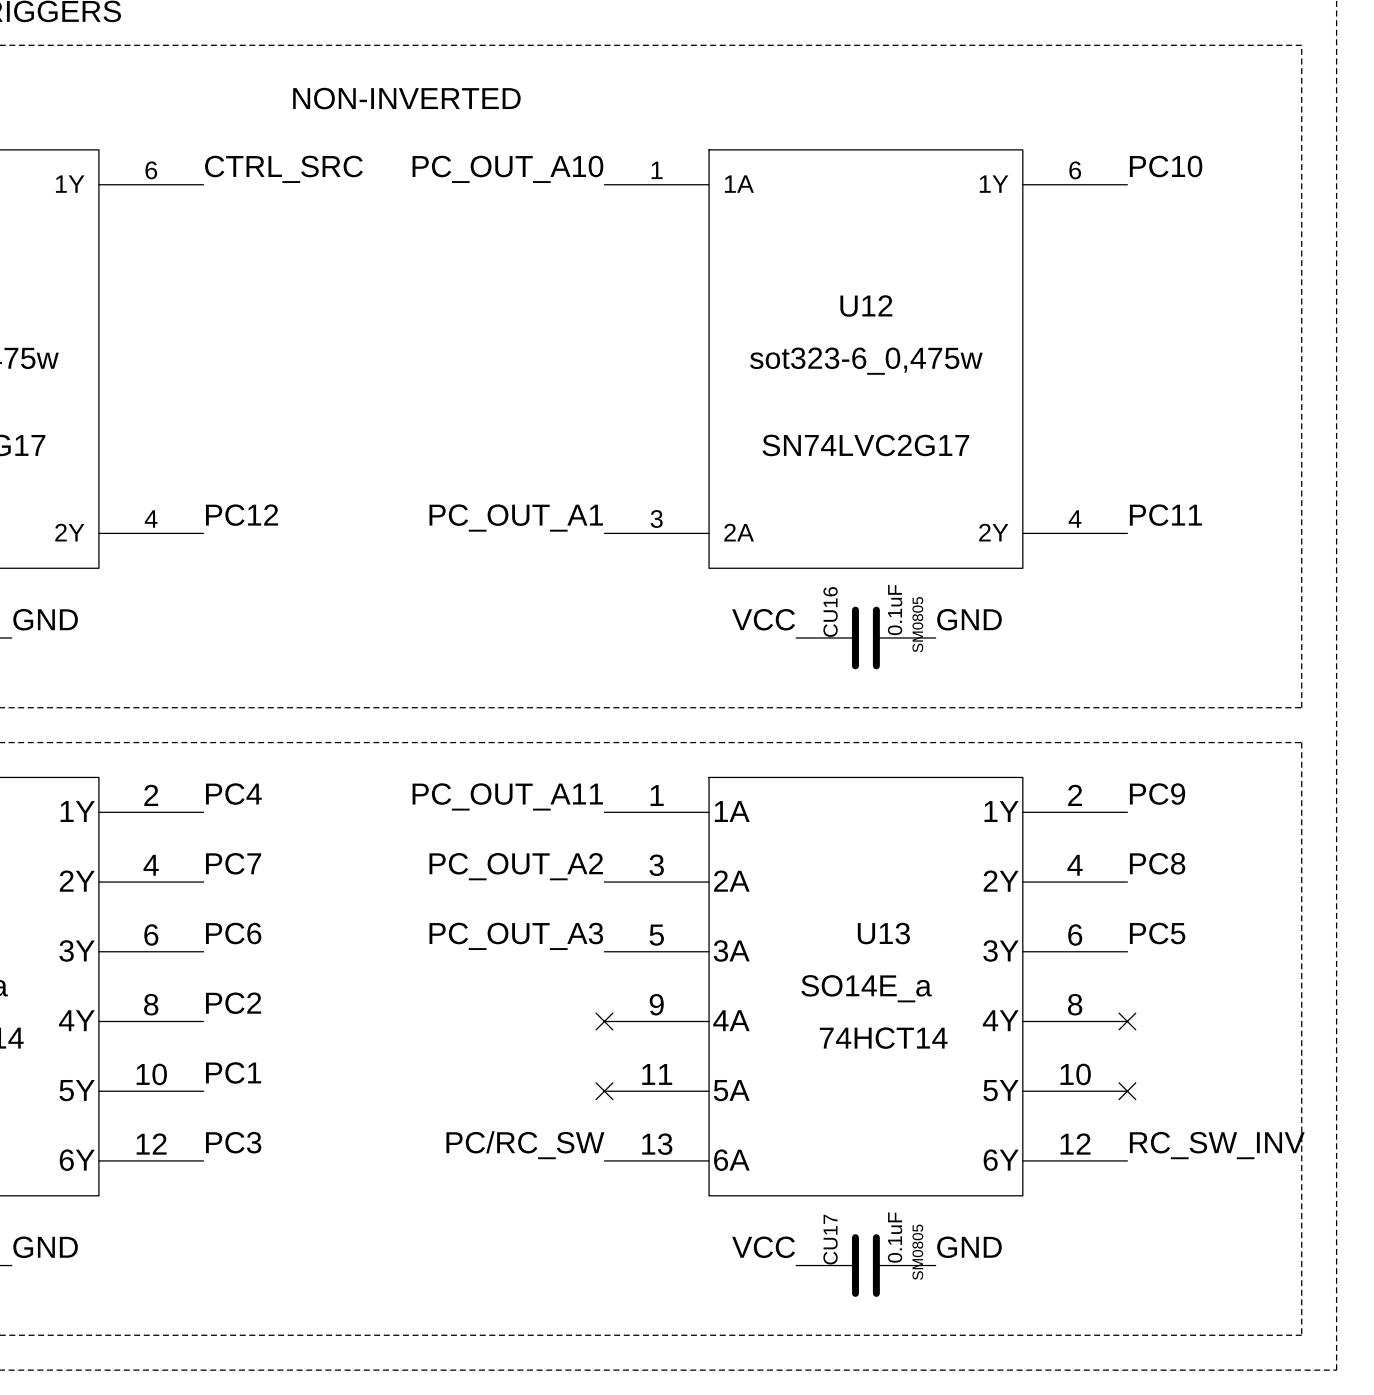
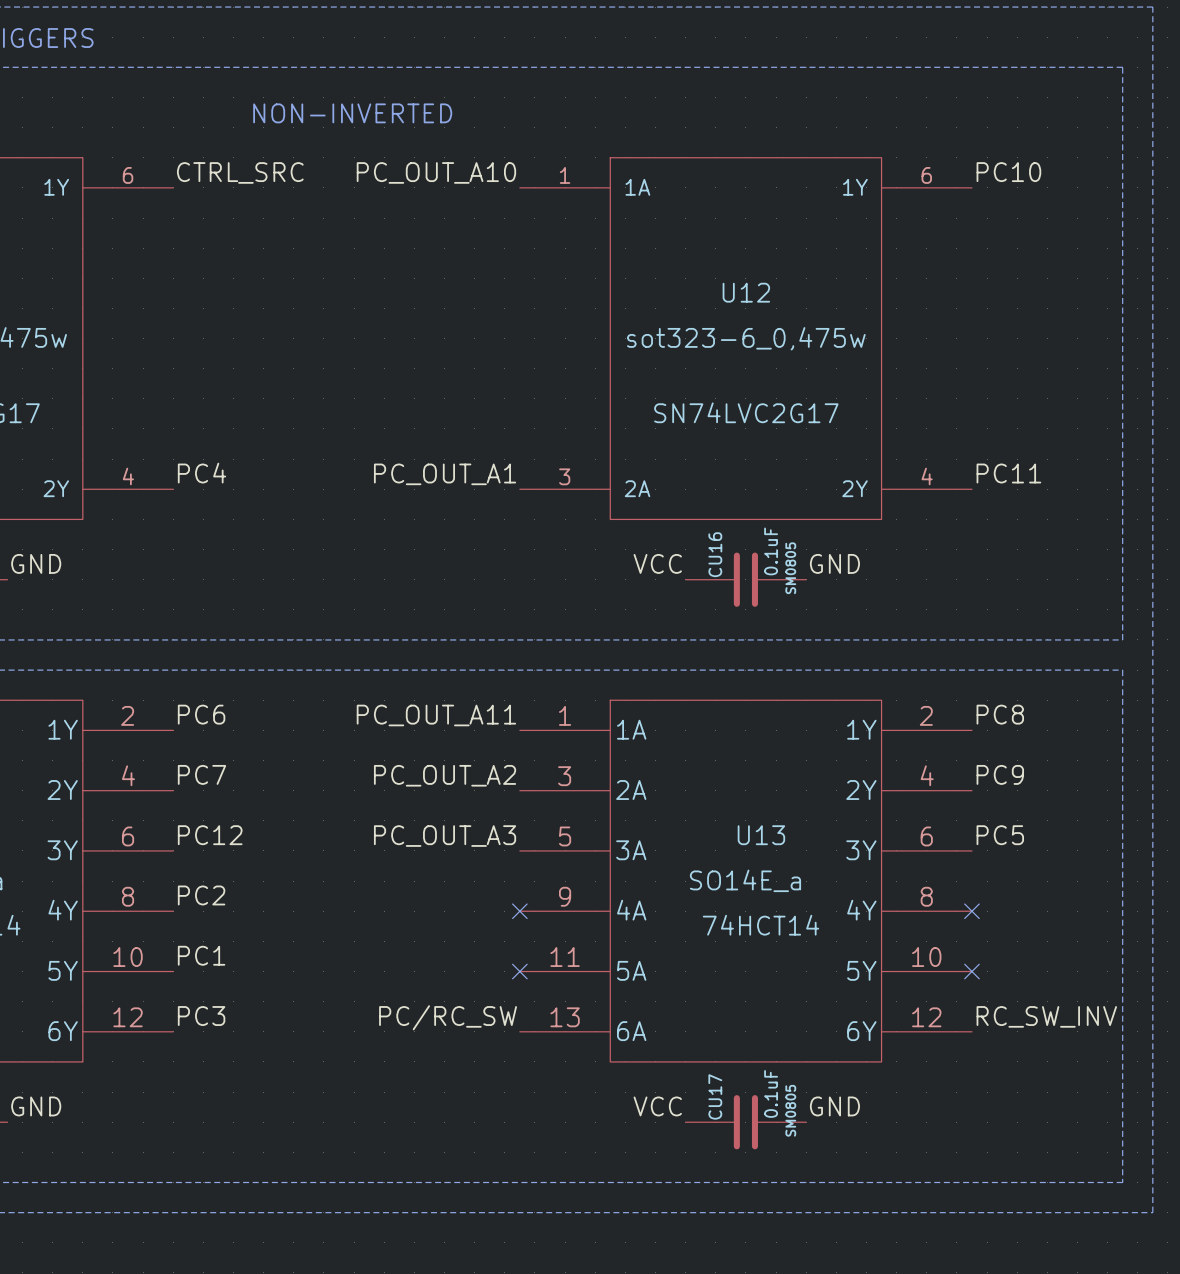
label: PC12 (242, 515) -> PC4 (201, 473)
label: PC4 (233, 794) -> PC6 (201, 714)
label: PC9 (1157, 794) -> PC8 (1000, 714)
label: PC8 (1157, 863) -> PC9 (1000, 774)
label: PC6 (233, 933) -> PC12 (210, 835)

